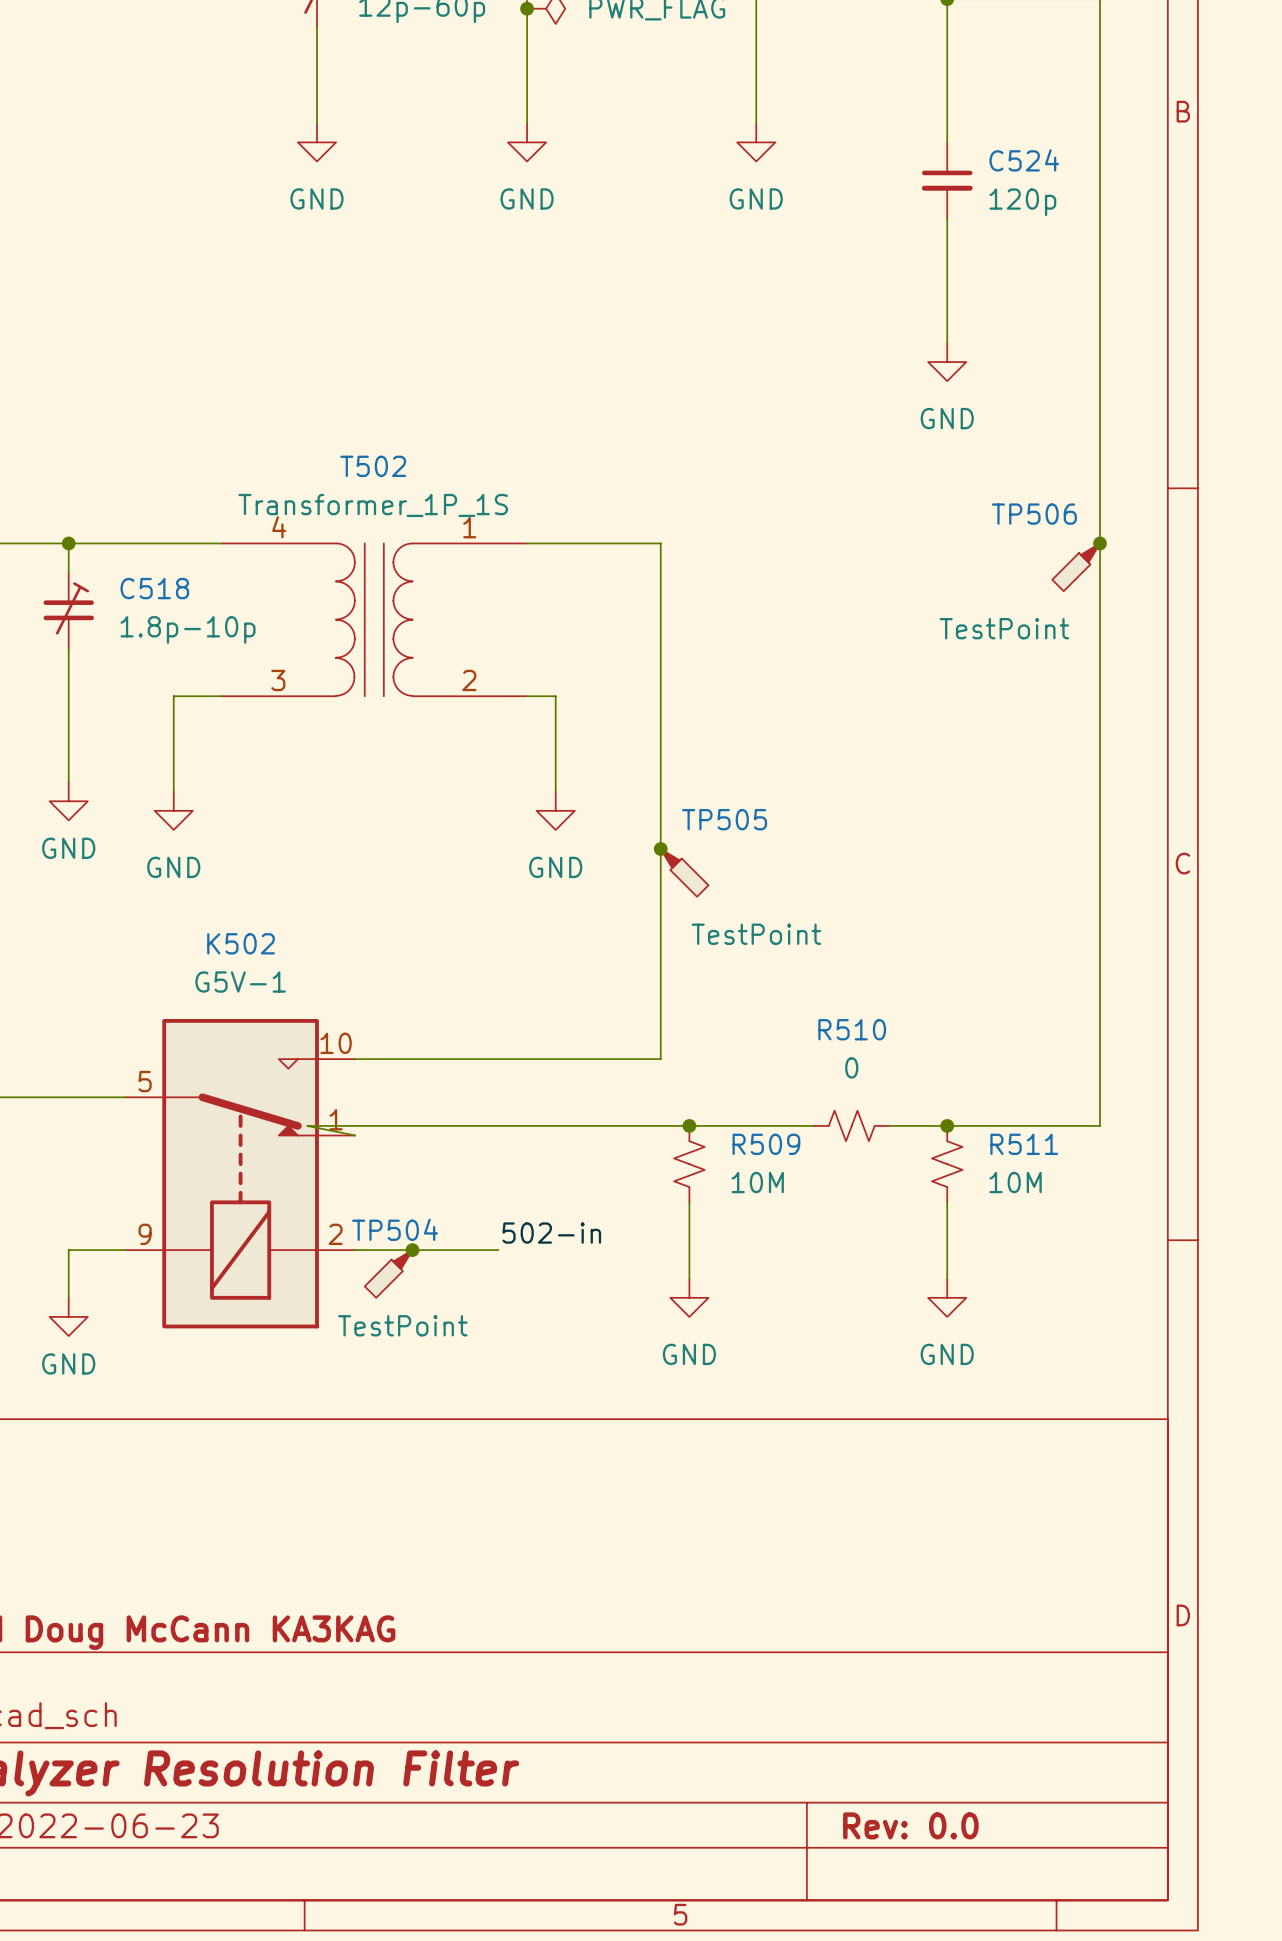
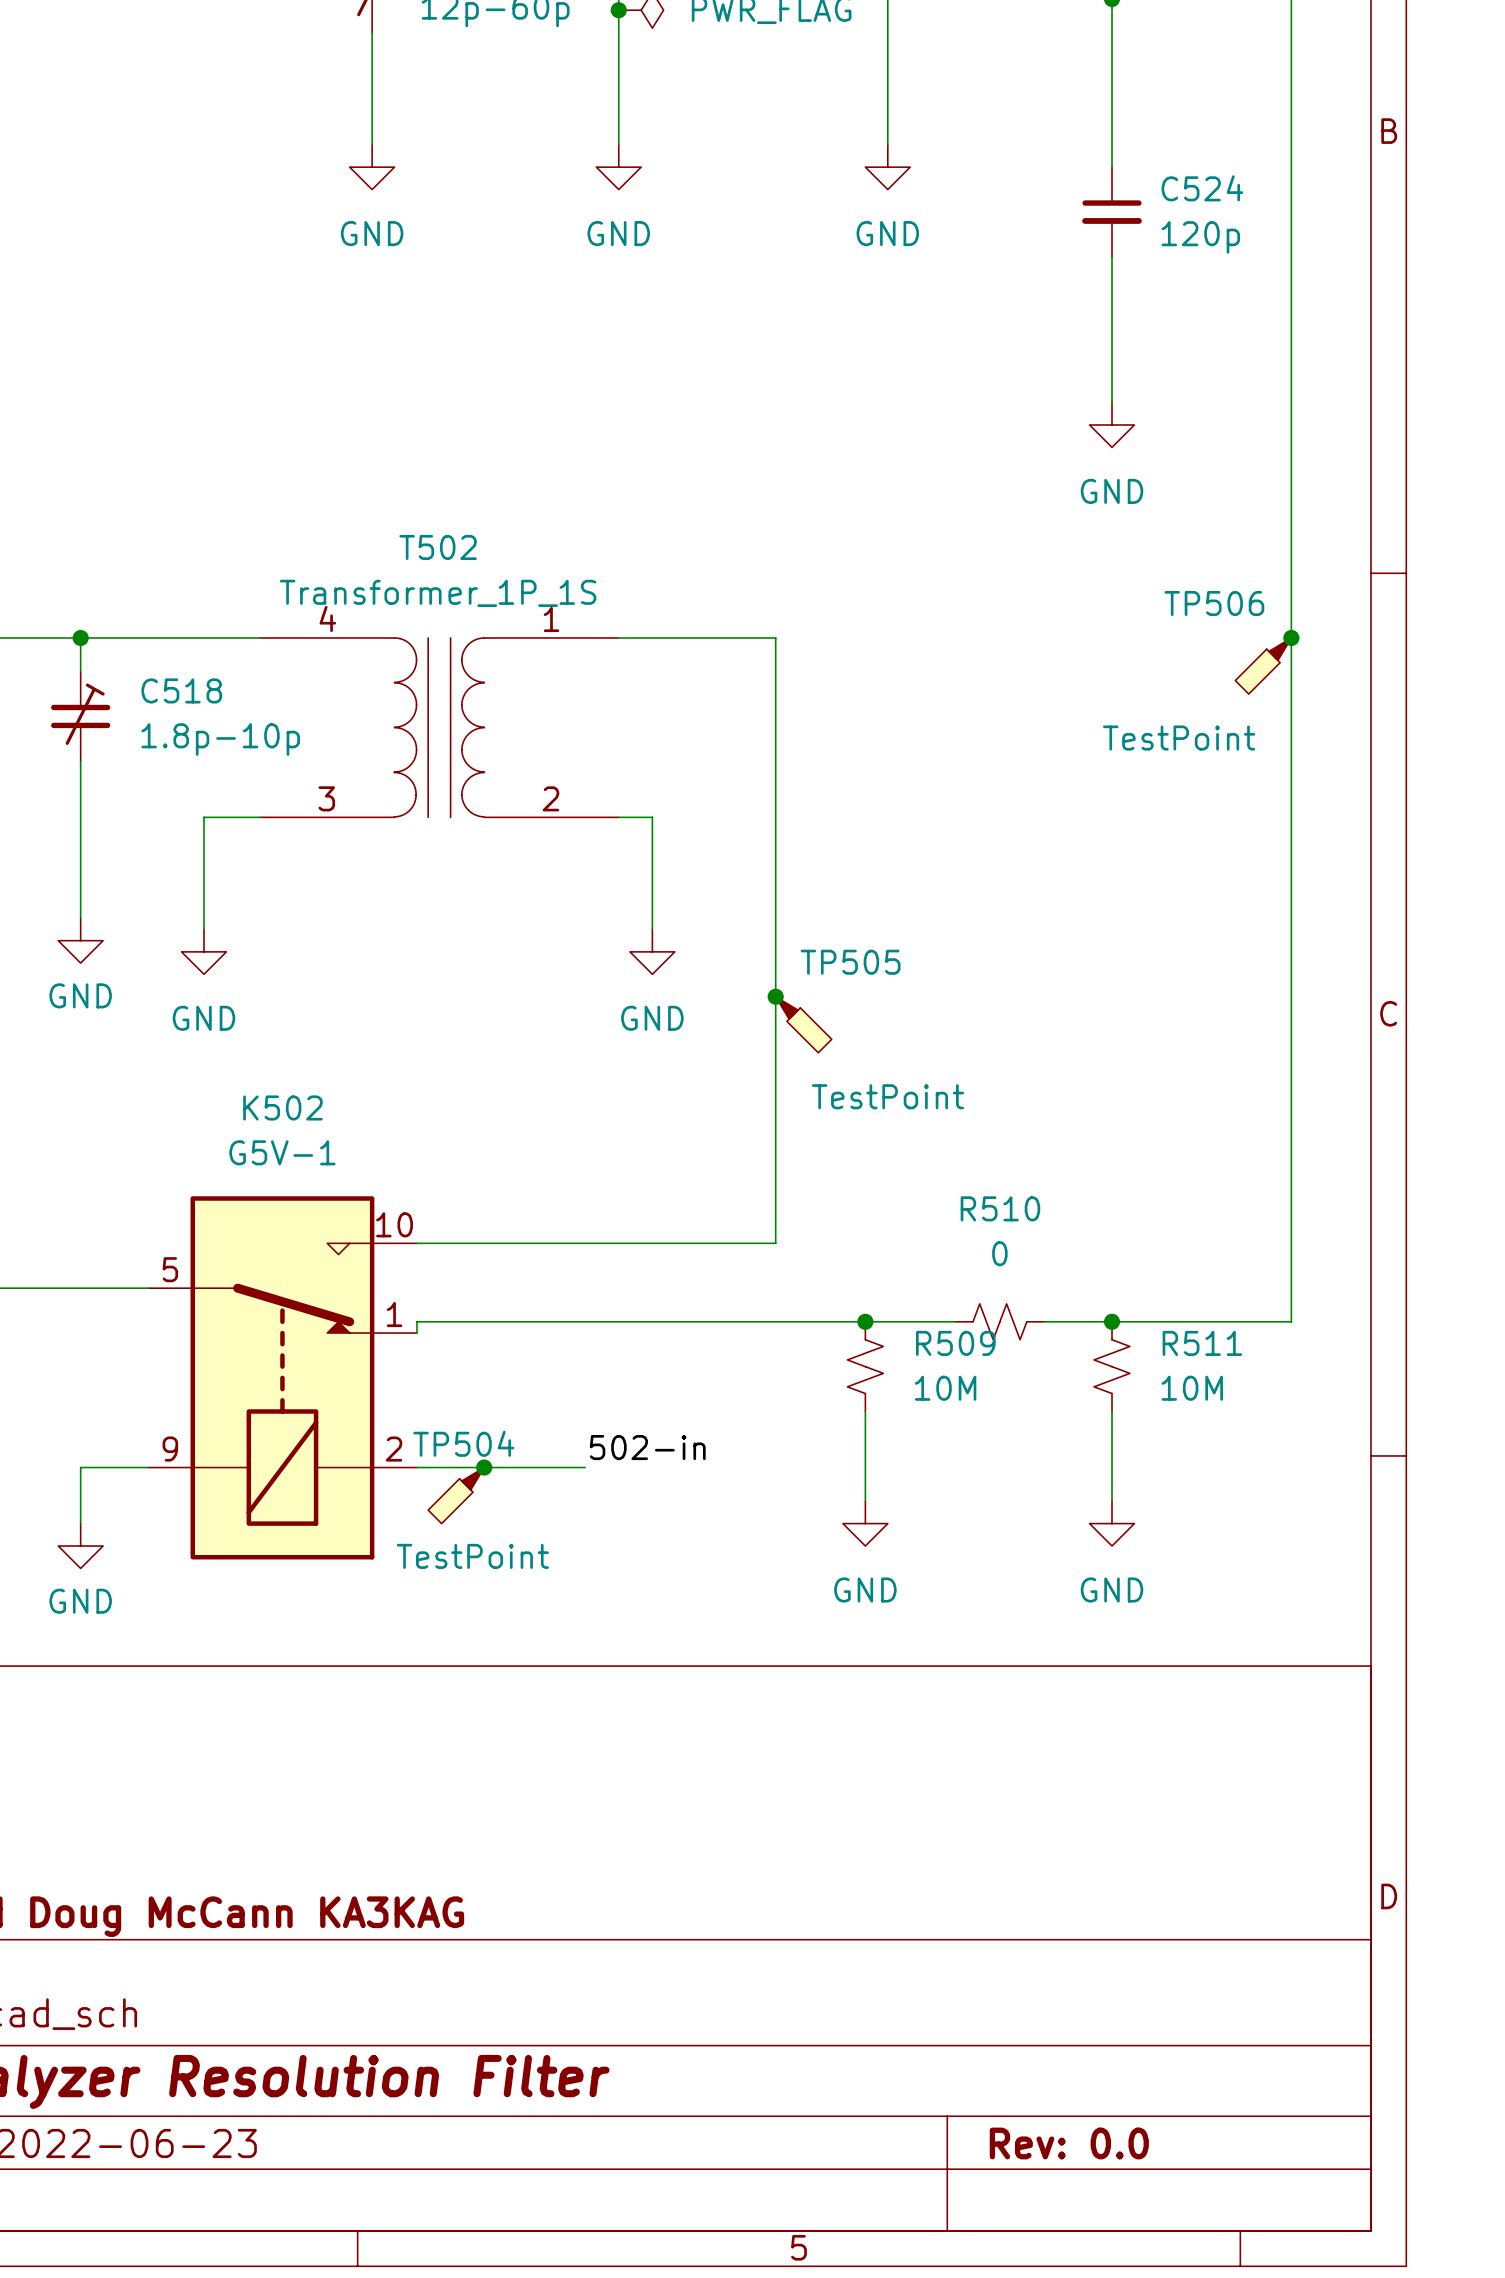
wire: (355, 1125) (307, 1125) (355, 1135) -> (416, 1321) (416, 1333)
junction position: (689, 1125) -> (865, 1321)
R509 position: (689, 1164) -> (865, 1366)
wire: (689, 1202) (689, 1278) -> (865, 1411) (865, 1501)
power symbol position: GND (689, 1297) -> GND (865, 1523)

